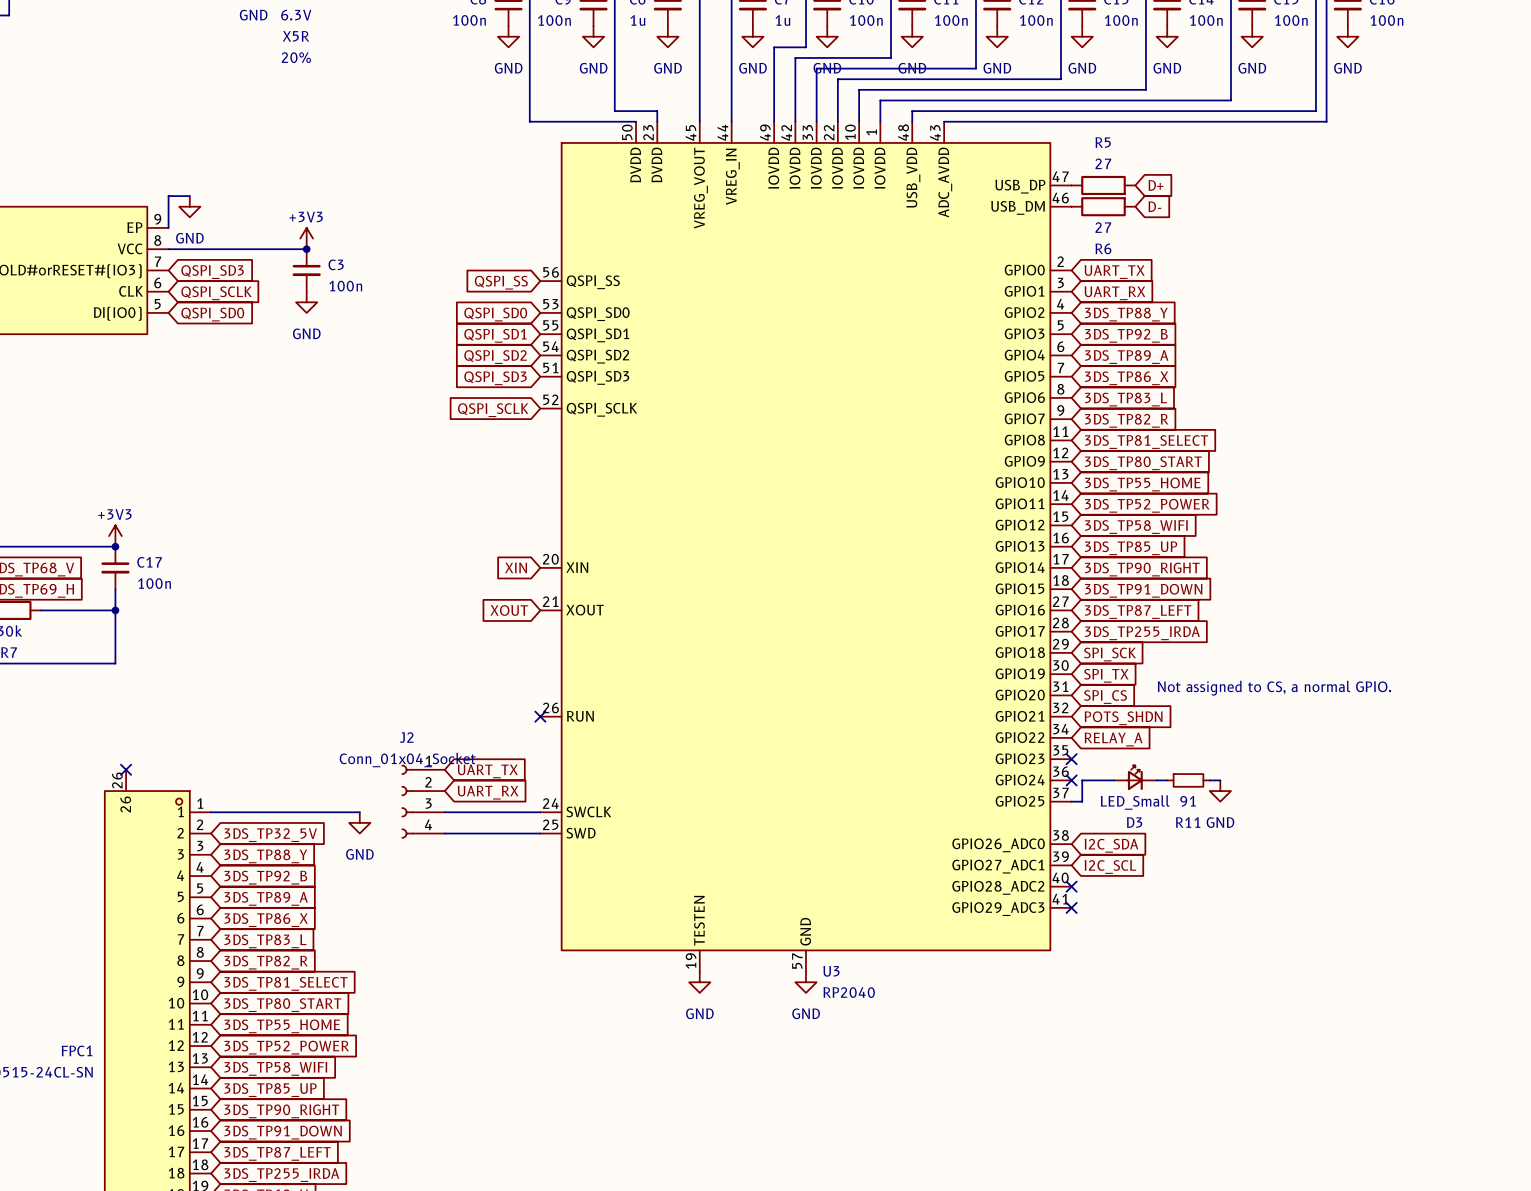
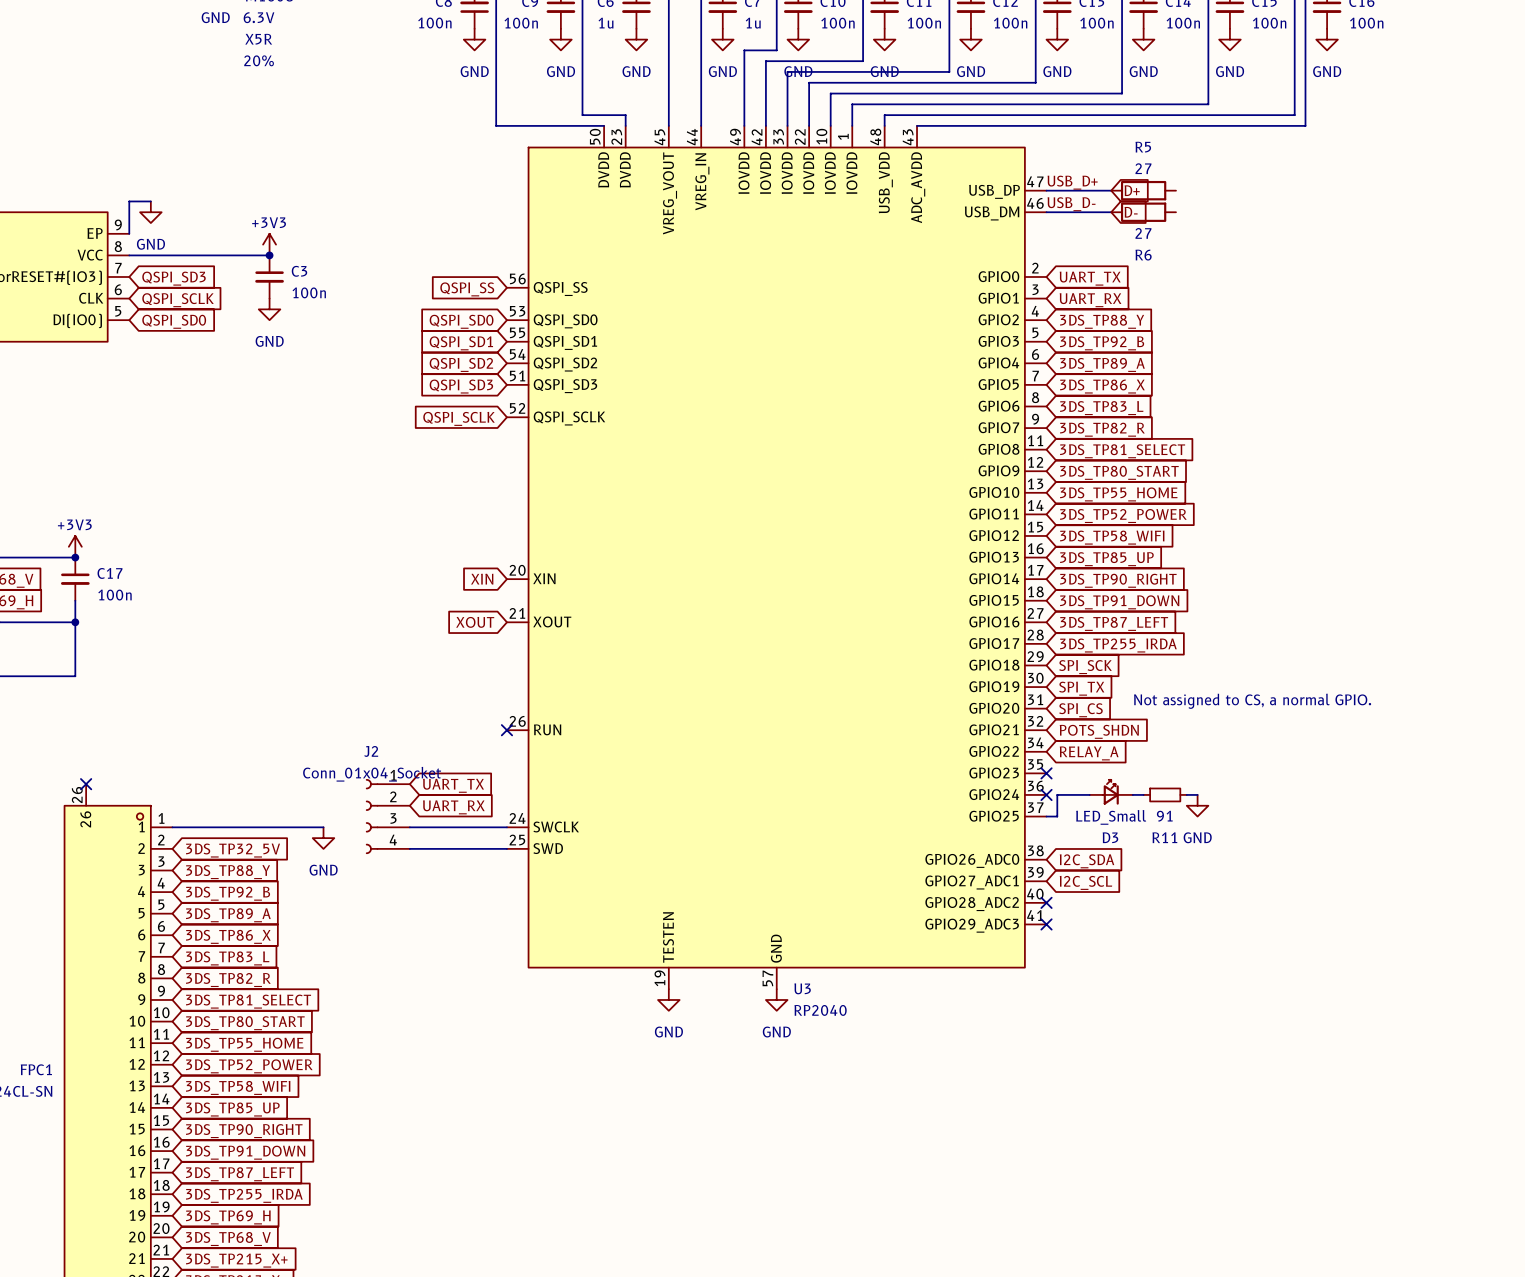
label: none -> USB_D+ (1072, 182)
wire: none -> (1046, 190) (1111, 190)
R5 position: (1103, 185) -> (1143, 190)
label: none -> USB_D- (1071, 204)
wire: none -> (1046, 212) (1111, 212)
R6 position: (1103, 206) -> (1143, 212)

